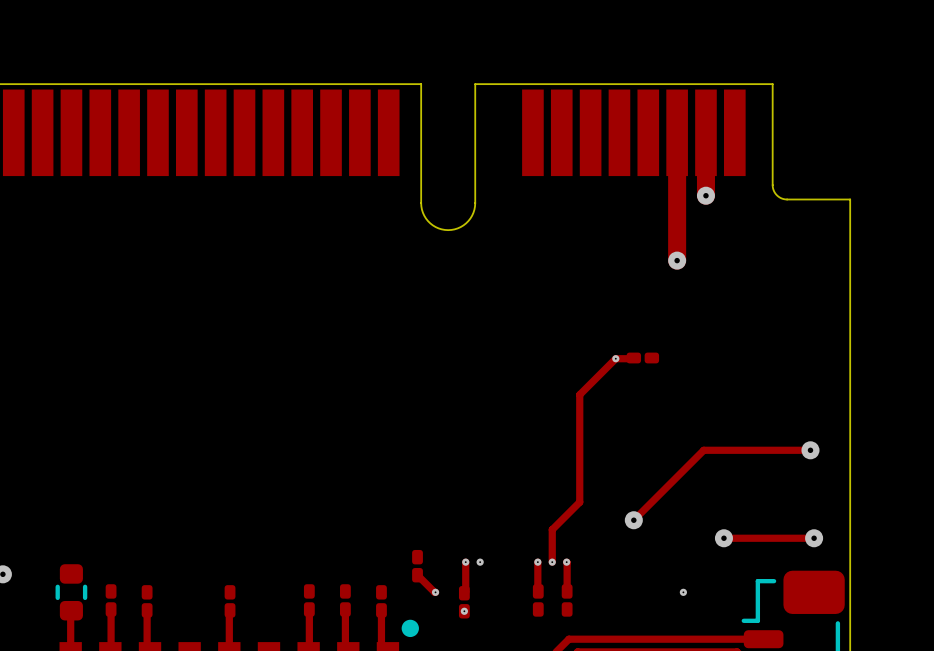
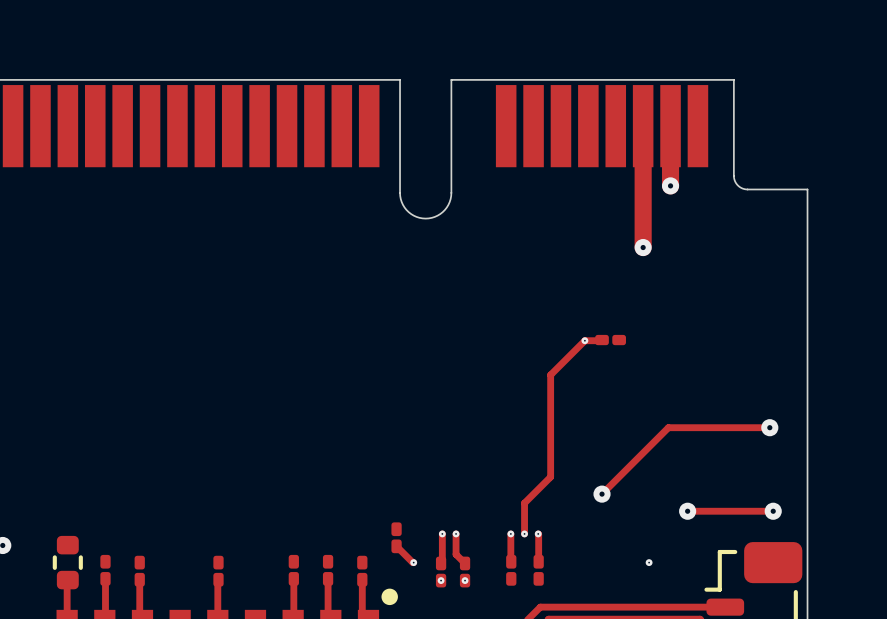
track: none -> (456, 533) (456, 554) (465, 563)
part: none -> (465, 572)
via: none -> (465, 580)

